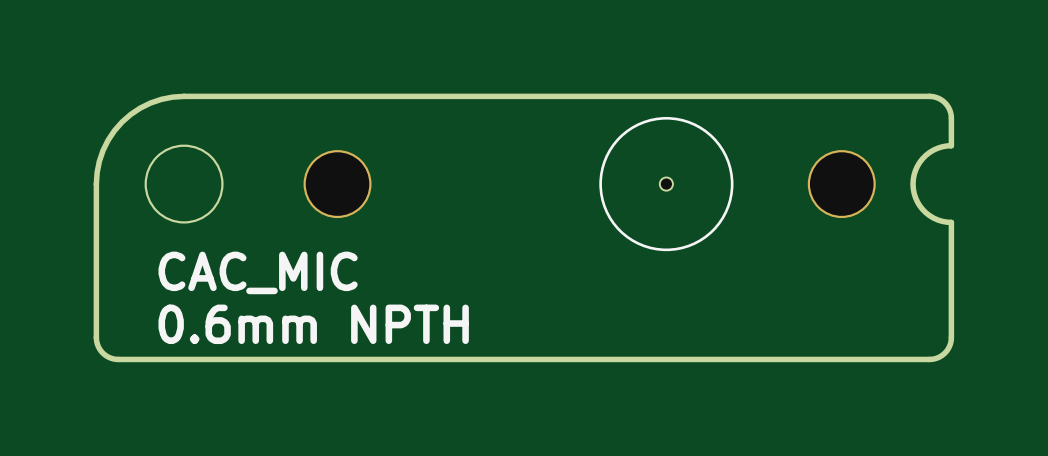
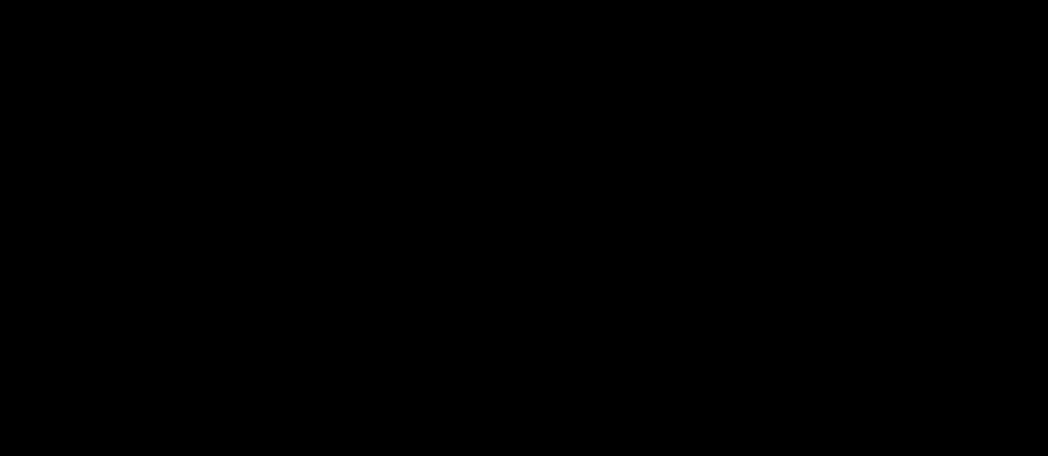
board edge: (929, 96) (184, 96) (161, 99) (140, 108) (122, 122) (108, 140) (99, 161) (96, 184) (97, 344) (106, 356) (118, 359) (936, 358) (946, 351) (951, 339) (951, 222) (933, 218) (922, 209) (914, 193) (913, 179) (917, 166) (925, 155) (937, 148) (951, 145) (951, 118) (949, 109) (944, 102) (937, 98) (929, 96) -> none
round board edge: [144, 144, 224, 224] -> none
part: (337, 184) -> none
part: (666, 184) -> none
part: (841, 184) -> none
text: CAC_MIC (258, 272) -> none
text: 0.6mm NPTH (313, 324) -> none

